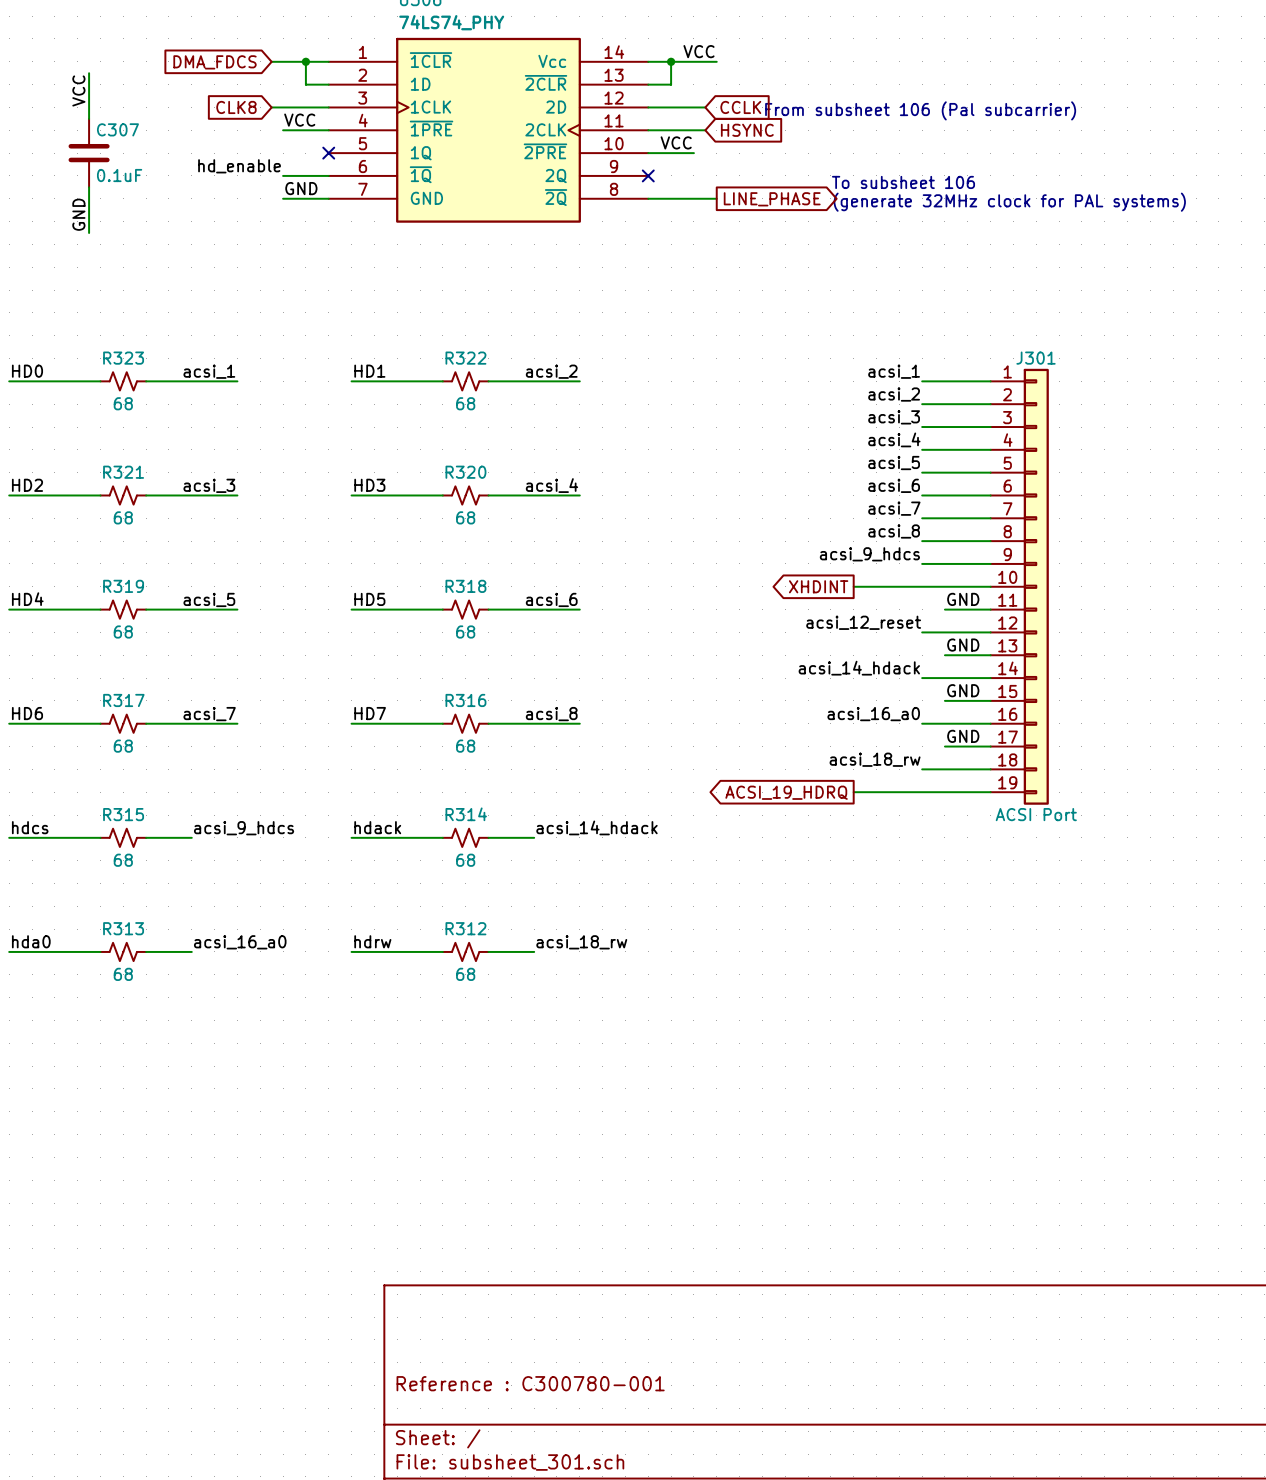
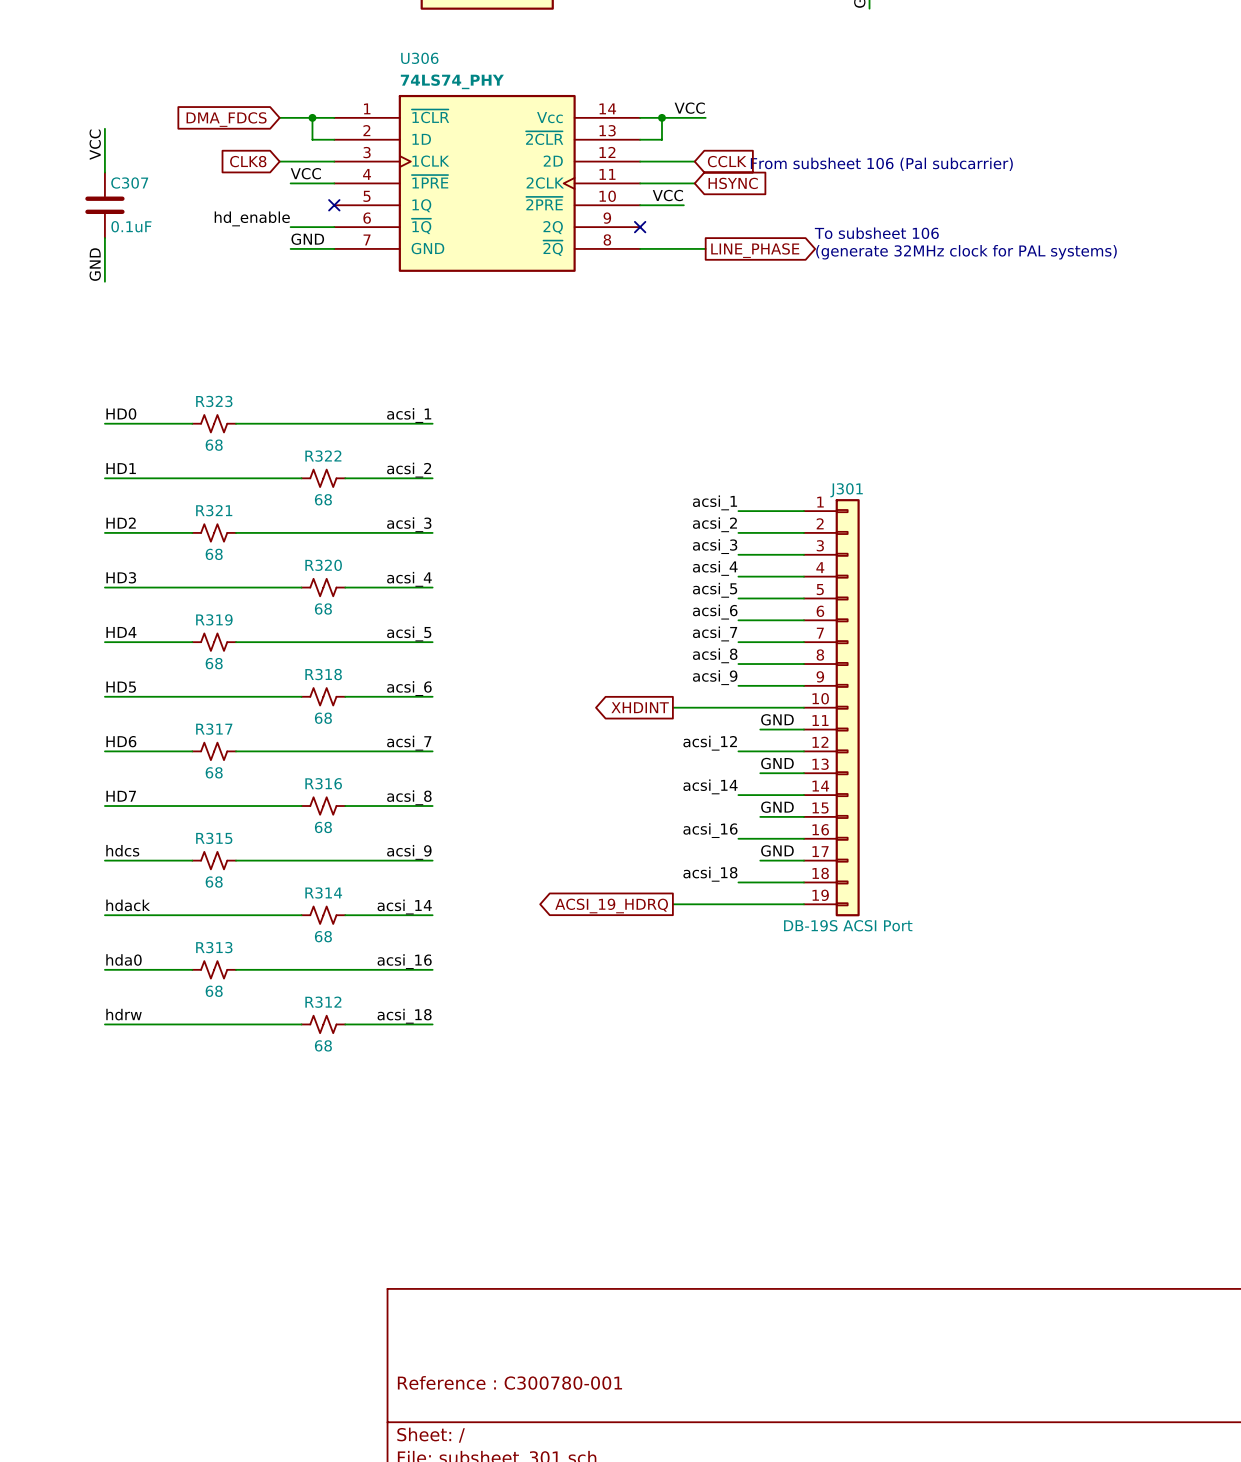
label position: HD0 (27, 371) -> HD0 (121, 413)
label position: acsi_1 (209, 371) -> acsi_1 (409, 415)
label: HD1 (369, 371) -> none
label: acsi_2 (551, 371) -> none
label position: acsi_1 (894, 371) -> acsi_1 (715, 502)
wire: (9, 381) (89, 381) -> none
R323 position: (123, 381) -> (214, 423)
wire: none -> (246, 423) (356, 423)
wire: (431, 381) (442, 381) -> none
R322 position: (465, 381) -> (323, 478)
wire: (488, 381) (579, 381) -> (345, 478) (432, 478)
wire: (922, 381) (990, 381) -> (738, 511) (803, 511)
label: acsi_2 (894, 394) -> none
wire: (922, 404) (990, 404) -> (738, 532) (803, 532)
label position: acsi_3 (894, 417) -> acsi_3 (715, 546)
wire: (922, 427) (990, 427) -> (738, 554) (803, 554)
label: none -> HD1 (121, 468)
label: none -> acsi_2 (409, 470)
wire: none -> (104, 478) (301, 478)
label: acsi_4 (894, 439) -> none
wire: (922, 449) (990, 449) -> (738, 576) (803, 576)
label position: acsi_5 (894, 463) -> acsi_5 (715, 590)
wire: (922, 472) (990, 472) -> (738, 598) (803, 598)
label position: HD2 (27, 485) -> HD2 (121, 523)
label position: acsi_3 (209, 485) -> acsi_3 (409, 524)
label: HD3 (369, 485) -> none
label: acsi_4 (552, 485) -> none
label: none -> acsi_2 (714, 524)
label: acsi_6 (894, 485) -> none
wire: (9, 495) (89, 495) -> none
R321 position: (123, 495) -> (214, 532)
wire: none -> (246, 532) (356, 532)
wire: (431, 495) (442, 495) -> none
R320 position: (465, 495) -> (323, 587)
wire: (488, 495) (579, 495) -> (345, 587) (432, 587)
wire: (922, 495) (990, 495) -> (738, 620) (803, 620)
label position: acsi_7 (894, 508) -> acsi_7 (715, 633)
wire: (922, 518) (990, 518) -> (738, 642) (803, 642)
label: none -> acsi_4 (715, 568)
label: acsi_8 (894, 531) -> none
wire: (922, 541) (990, 541) -> (738, 664) (803, 664)
label: none -> HD3 (121, 577)
label: none -> acsi_4 (409, 579)
wire: none -> (104, 587) (301, 587)
label: acsi_9_hdcs (869, 554) -> none
wire: (922, 563) (990, 563) -> (738, 685) (803, 685)
label: none -> acsi_6 (715, 612)
global label position: XHDINT (818, 586) -> XHDINT (640, 707)
wire: (853, 586) (990, 586) -> (672, 707) (803, 707)
J301 position: (1019, 586) -> (831, 707)
label position: HD4 (27, 599) -> HD4 (121, 632)
label position: acsi_5 (209, 599) -> acsi_5 (409, 633)
label: HD5 (369, 599) -> none
label: acsi_6 (551, 599) -> none
label: GND (963, 599) -> none
wire: (9, 609) (89, 609) -> none
R319 position: (123, 609) -> (214, 642)
wire: none -> (246, 642) (356, 642)
wire: (431, 609) (442, 609) -> none
R318 position: (465, 609) -> (323, 696)
wire: (488, 609) (579, 609) -> (345, 696) (432, 696)
wire: (944, 609) (990, 609) -> (760, 729) (803, 729)
label: none -> acsi_8 (715, 655)
label: acsi_12_reset (863, 622) -> none
wire: (922, 632) (990, 632) -> (738, 751) (803, 751)
label: none -> acsi_9 (715, 677)
label: GND (963, 645) -> none
wire: (944, 655) (990, 655) -> (760, 773) (803, 773)
label: none -> HD5 (121, 687)
label: none -> acsi_6 (409, 688)
wire: none -> (104, 696) (301, 696)
label: acsi_14_hdack (859, 668) -> none
wire: (922, 678) (990, 678) -> (738, 795) (803, 795)
label: none -> GND (777, 719)
label: GND (963, 690) -> none
wire: (944, 700) (990, 700) -> (760, 816) (803, 816)
label position: HD6 (27, 713) -> HD6 (121, 741)
label: HD7 (370, 713) -> none
label position: acsi_7 (209, 714) -> acsi_7 (409, 743)
label: acsi_8 (551, 714) -> none
label: none -> acsi_12 (710, 743)
label: acsi_16_a0 (873, 714) -> none
wire: (9, 723) (89, 723) -> none
R317 position: (123, 723) -> (214, 751)
wire: none -> (246, 751) (356, 751)
wire: (431, 723) (442, 723) -> none
R316 position: (465, 723) -> (323, 806)
wire: (488, 723) (579, 723) -> (345, 806) (432, 806)
wire: (922, 723) (990, 723) -> (738, 838) (803, 838)
label: none -> GND (777, 763)
label: GND (963, 736) -> none
wire: (944, 746) (990, 746) -> (760, 860) (803, 860)
label: none -> acsi_14 (710, 786)
label: acsi_18_rw (875, 759) -> none
wire: (922, 769) (990, 769) -> (738, 882) (803, 882)
label: none -> HD7 (121, 796)
label: none -> acsi_8 (409, 797)
wire: none -> (104, 806) (301, 806)
label: none -> GND (777, 807)
global label position: ACSI_19_HDRQ (786, 792) -> ACSI_19_HDRQ (611, 905)
wire: (853, 792) (990, 792) -> (672, 904) (803, 904)
label: none -> acsi_16 (710, 830)
J301 value: ACSI Port (1036, 814) -> DB-19S ACSI Port (848, 925)
label position: hdcs (30, 827) -> hdcs (122, 850)
label: hdack (377, 827) -> none
label: acsi_14_hdack (597, 827) -> none
label: none -> GND (777, 850)
label: acsi_9_hdcs (244, 828) -> none
label: none -> acsi_9 (409, 852)
wire: (9, 837) (89, 837) -> none
R315 position: (123, 837) -> (214, 860)
wire: none -> (236, 860) (356, 860)
wire: (431, 837) (442, 837) -> none
R314 position: (465, 837) -> (323, 915)
wire: (488, 837) (534, 837) -> none
label: none -> acsi_18 (710, 874)
label: none -> hdack (128, 905)
label: none -> acsi_14 (404, 907)
wire: none -> (104, 915) (301, 915)
wire: none -> (345, 915) (432, 915)
label position: hda0 (31, 941) -> hda0 (123, 959)
label: hdrw (372, 941) -> none
label: acsi_16_a0 (240, 942) -> none
label: none -> acsi_16 (404, 961)
label: acsi_18_rw (581, 942) -> none
wire: (9, 951) (89, 951) -> none
R313 position: (123, 951) -> (214, 969)
wire: none -> (236, 969) (356, 969)
wire: (431, 951) (442, 951) -> none
R312 position: (465, 951) -> (323, 1024)
wire: (488, 951) (534, 951) -> none
label: none -> hdrw (124, 1014)
label: none -> acsi_18 (404, 1016)
wire: none -> (104, 1024) (301, 1024)
wire: none -> (345, 1024) (432, 1024)

